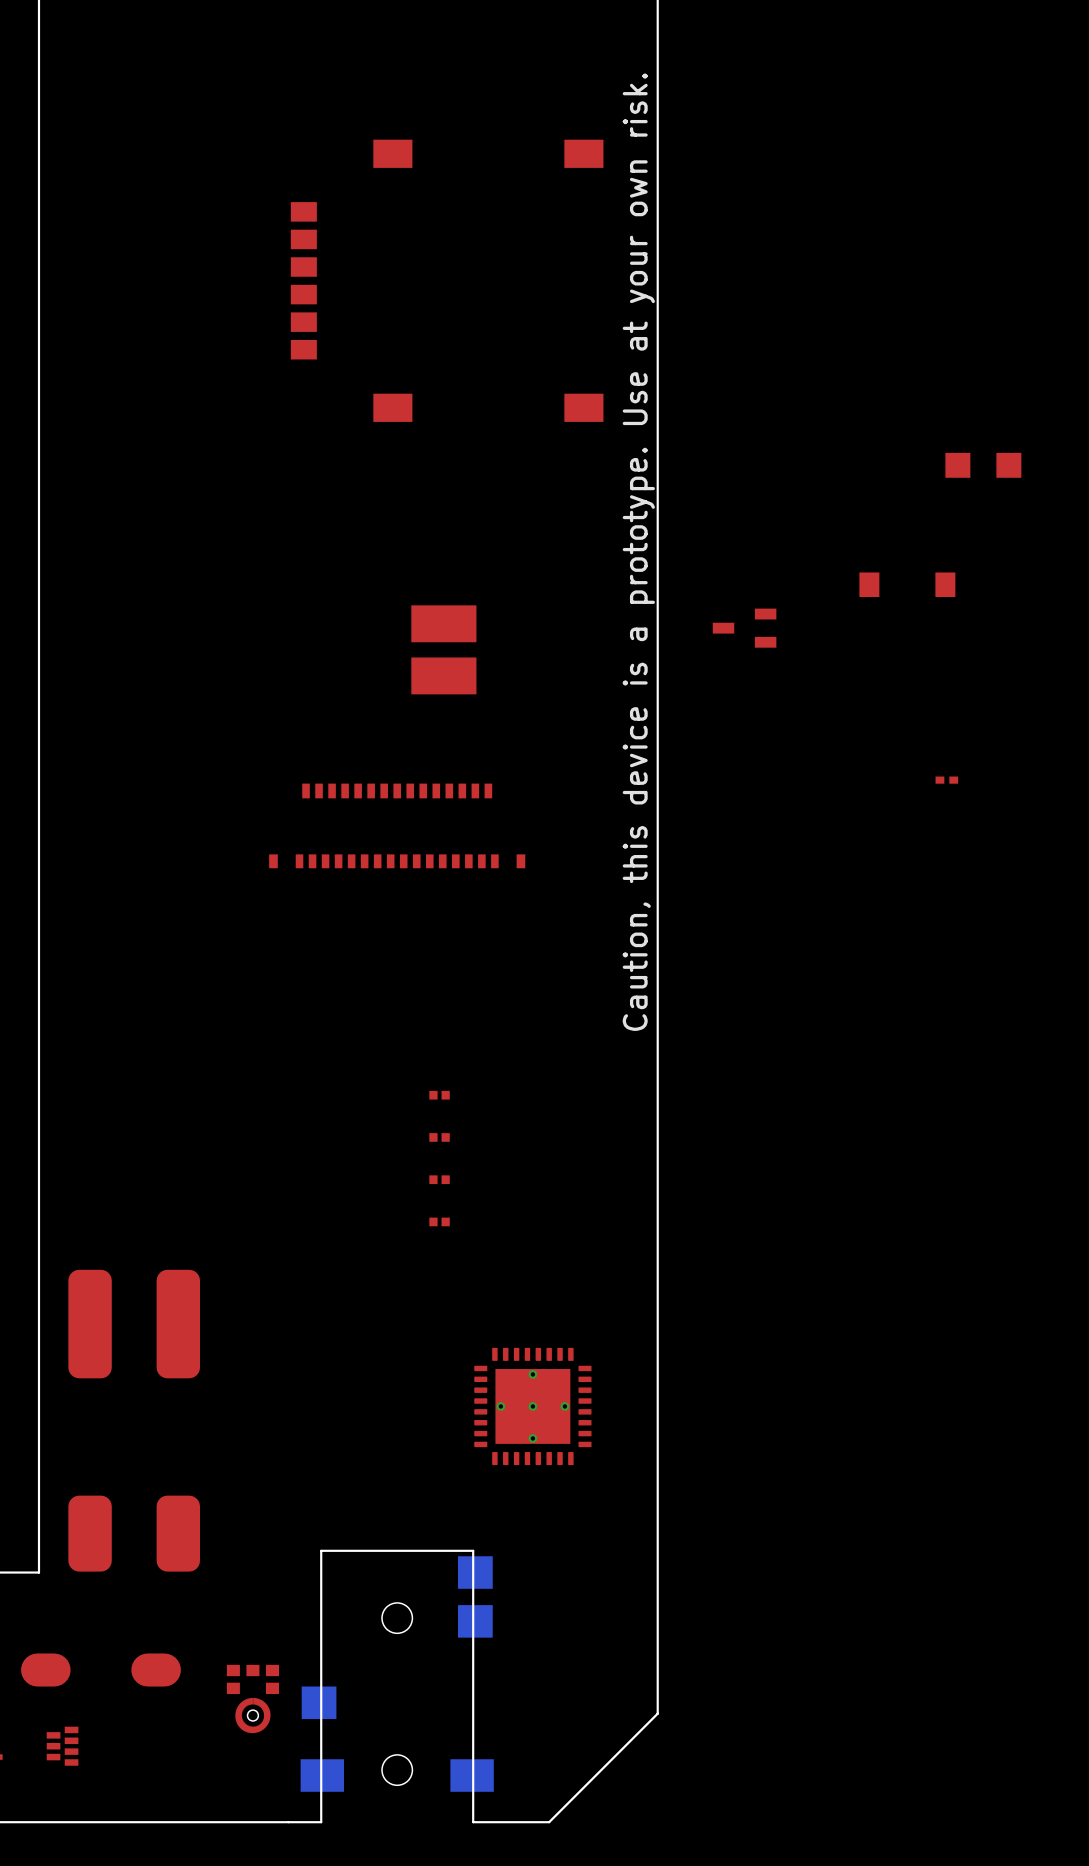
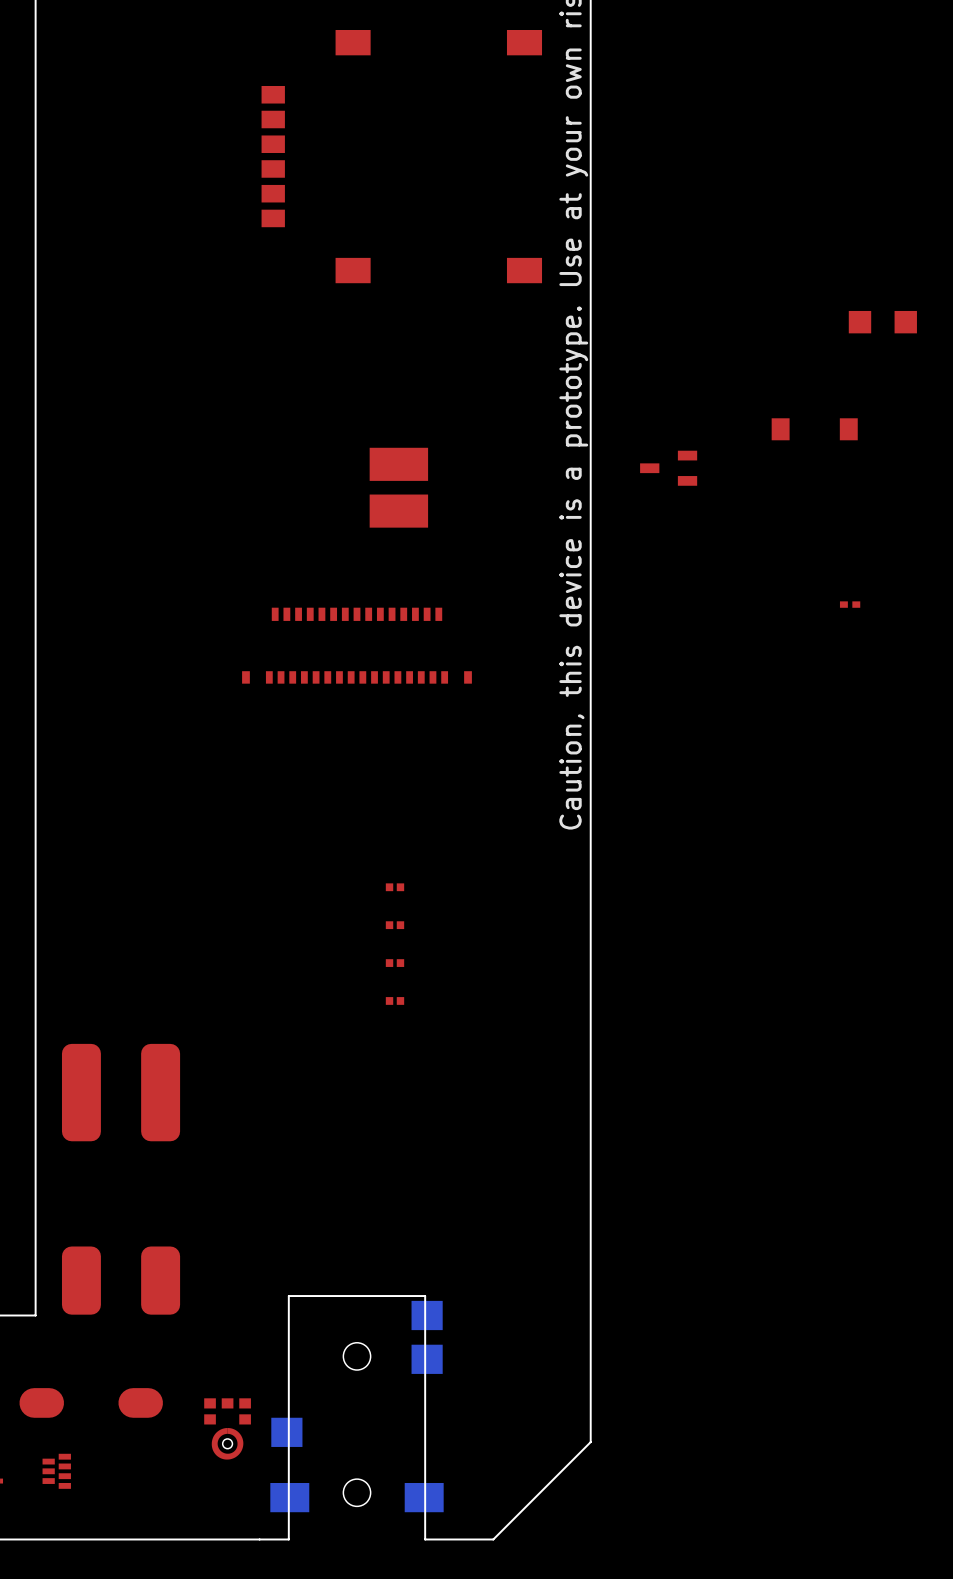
part: (532, 1406) -> none

